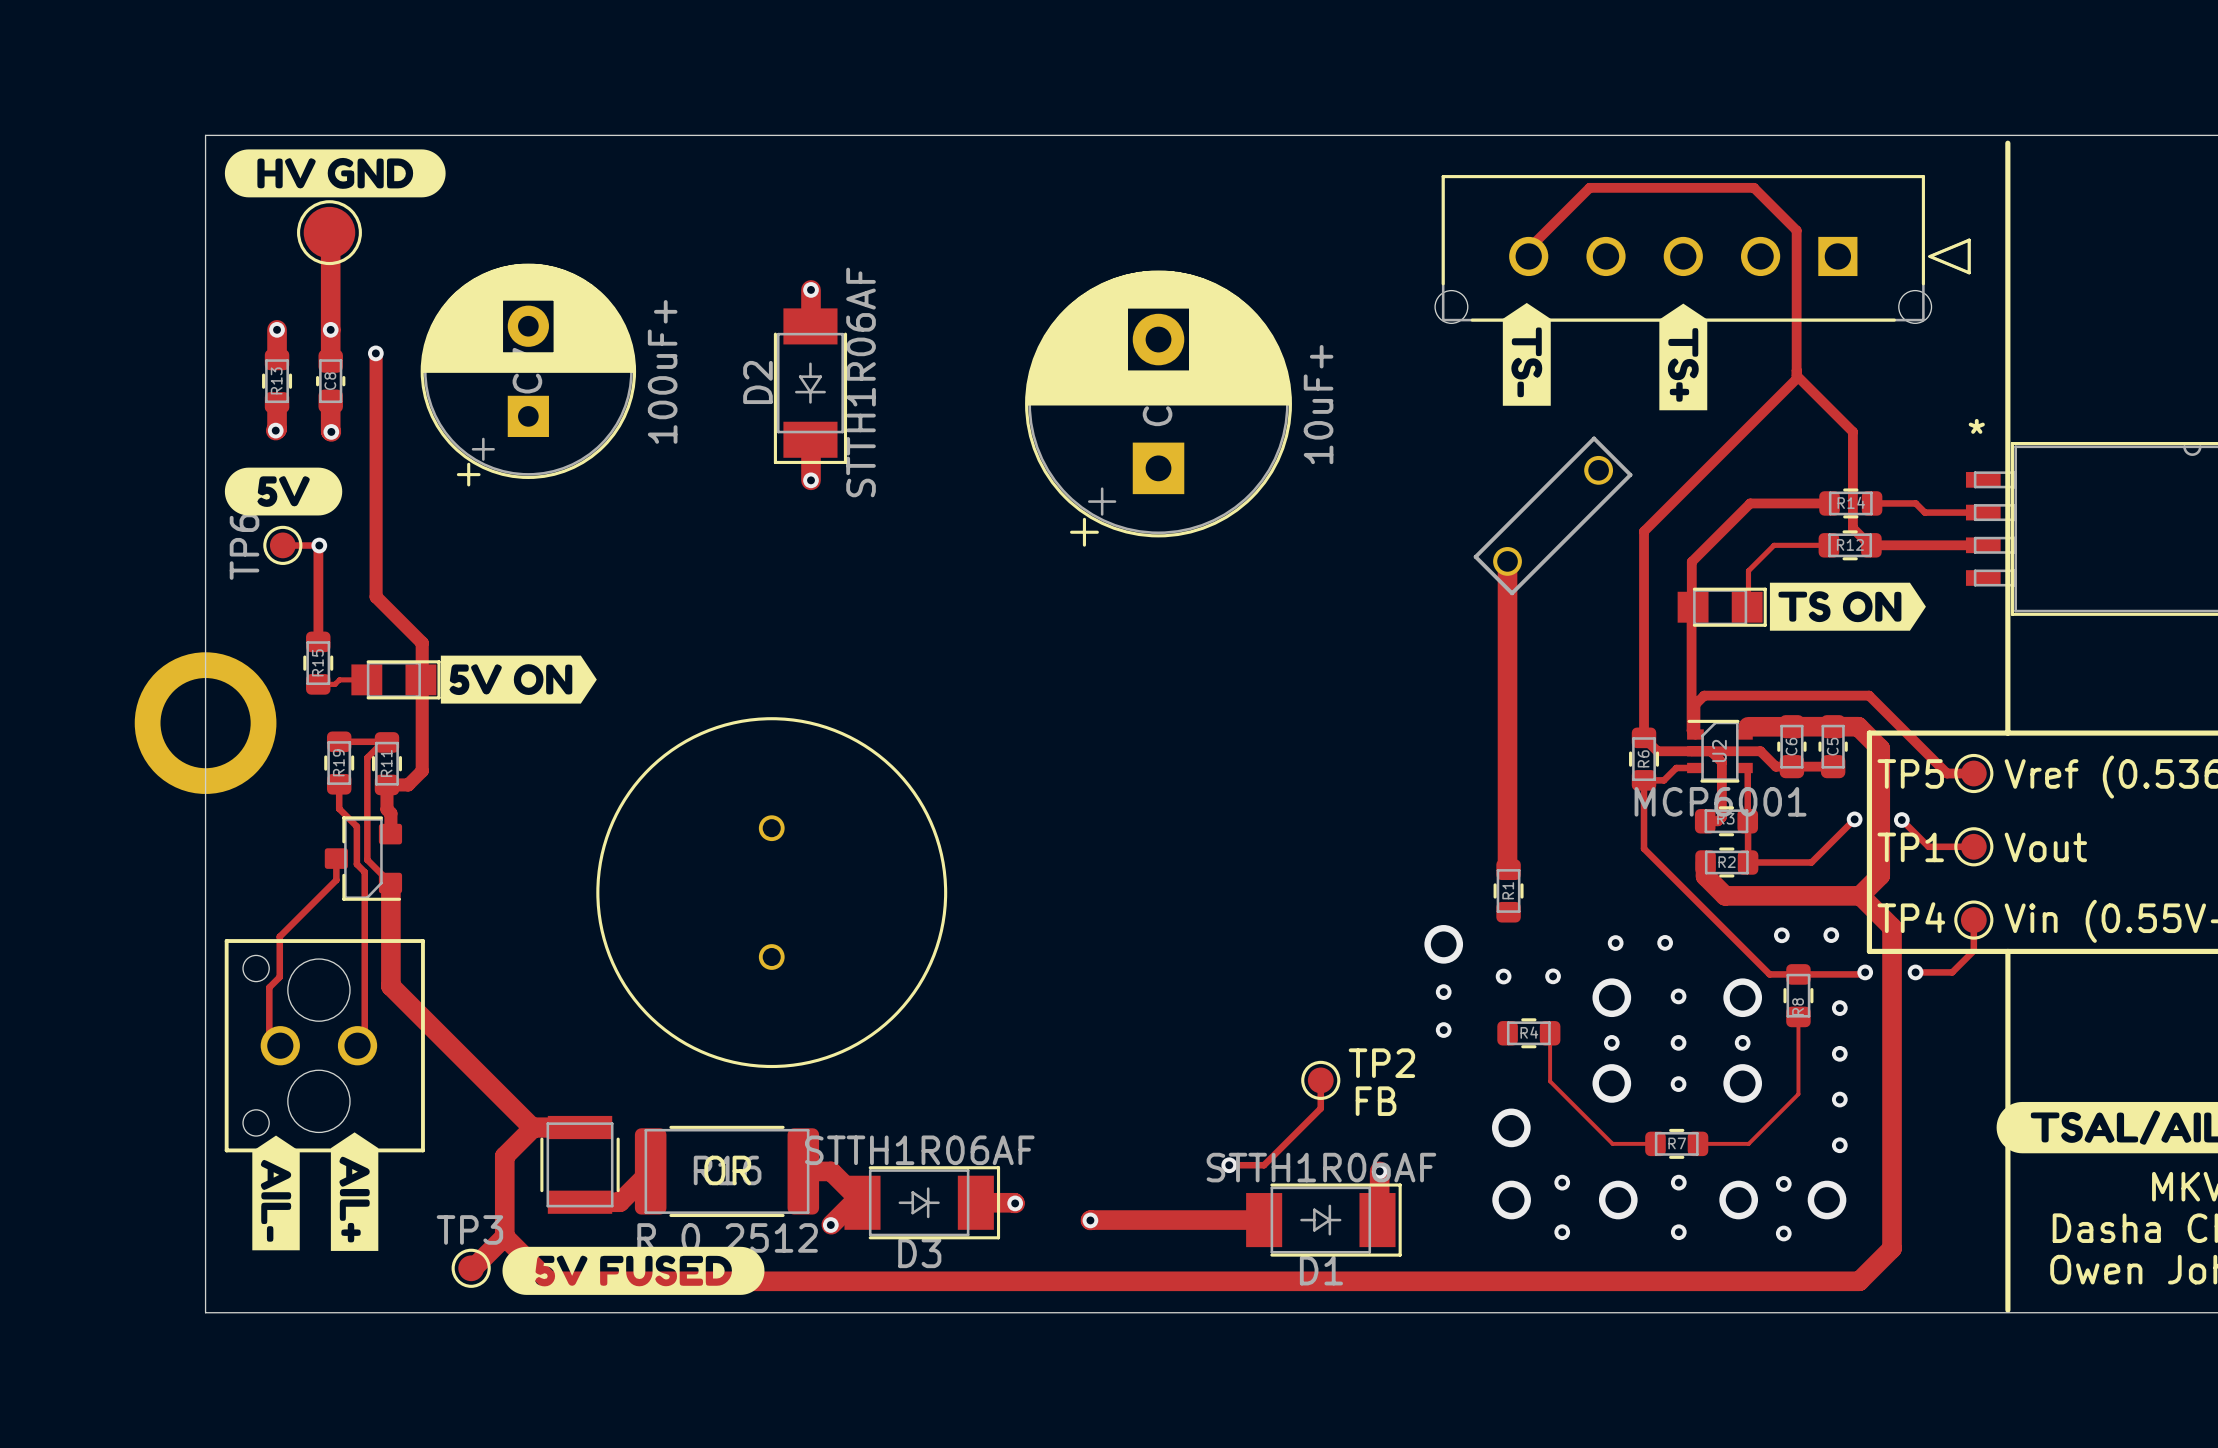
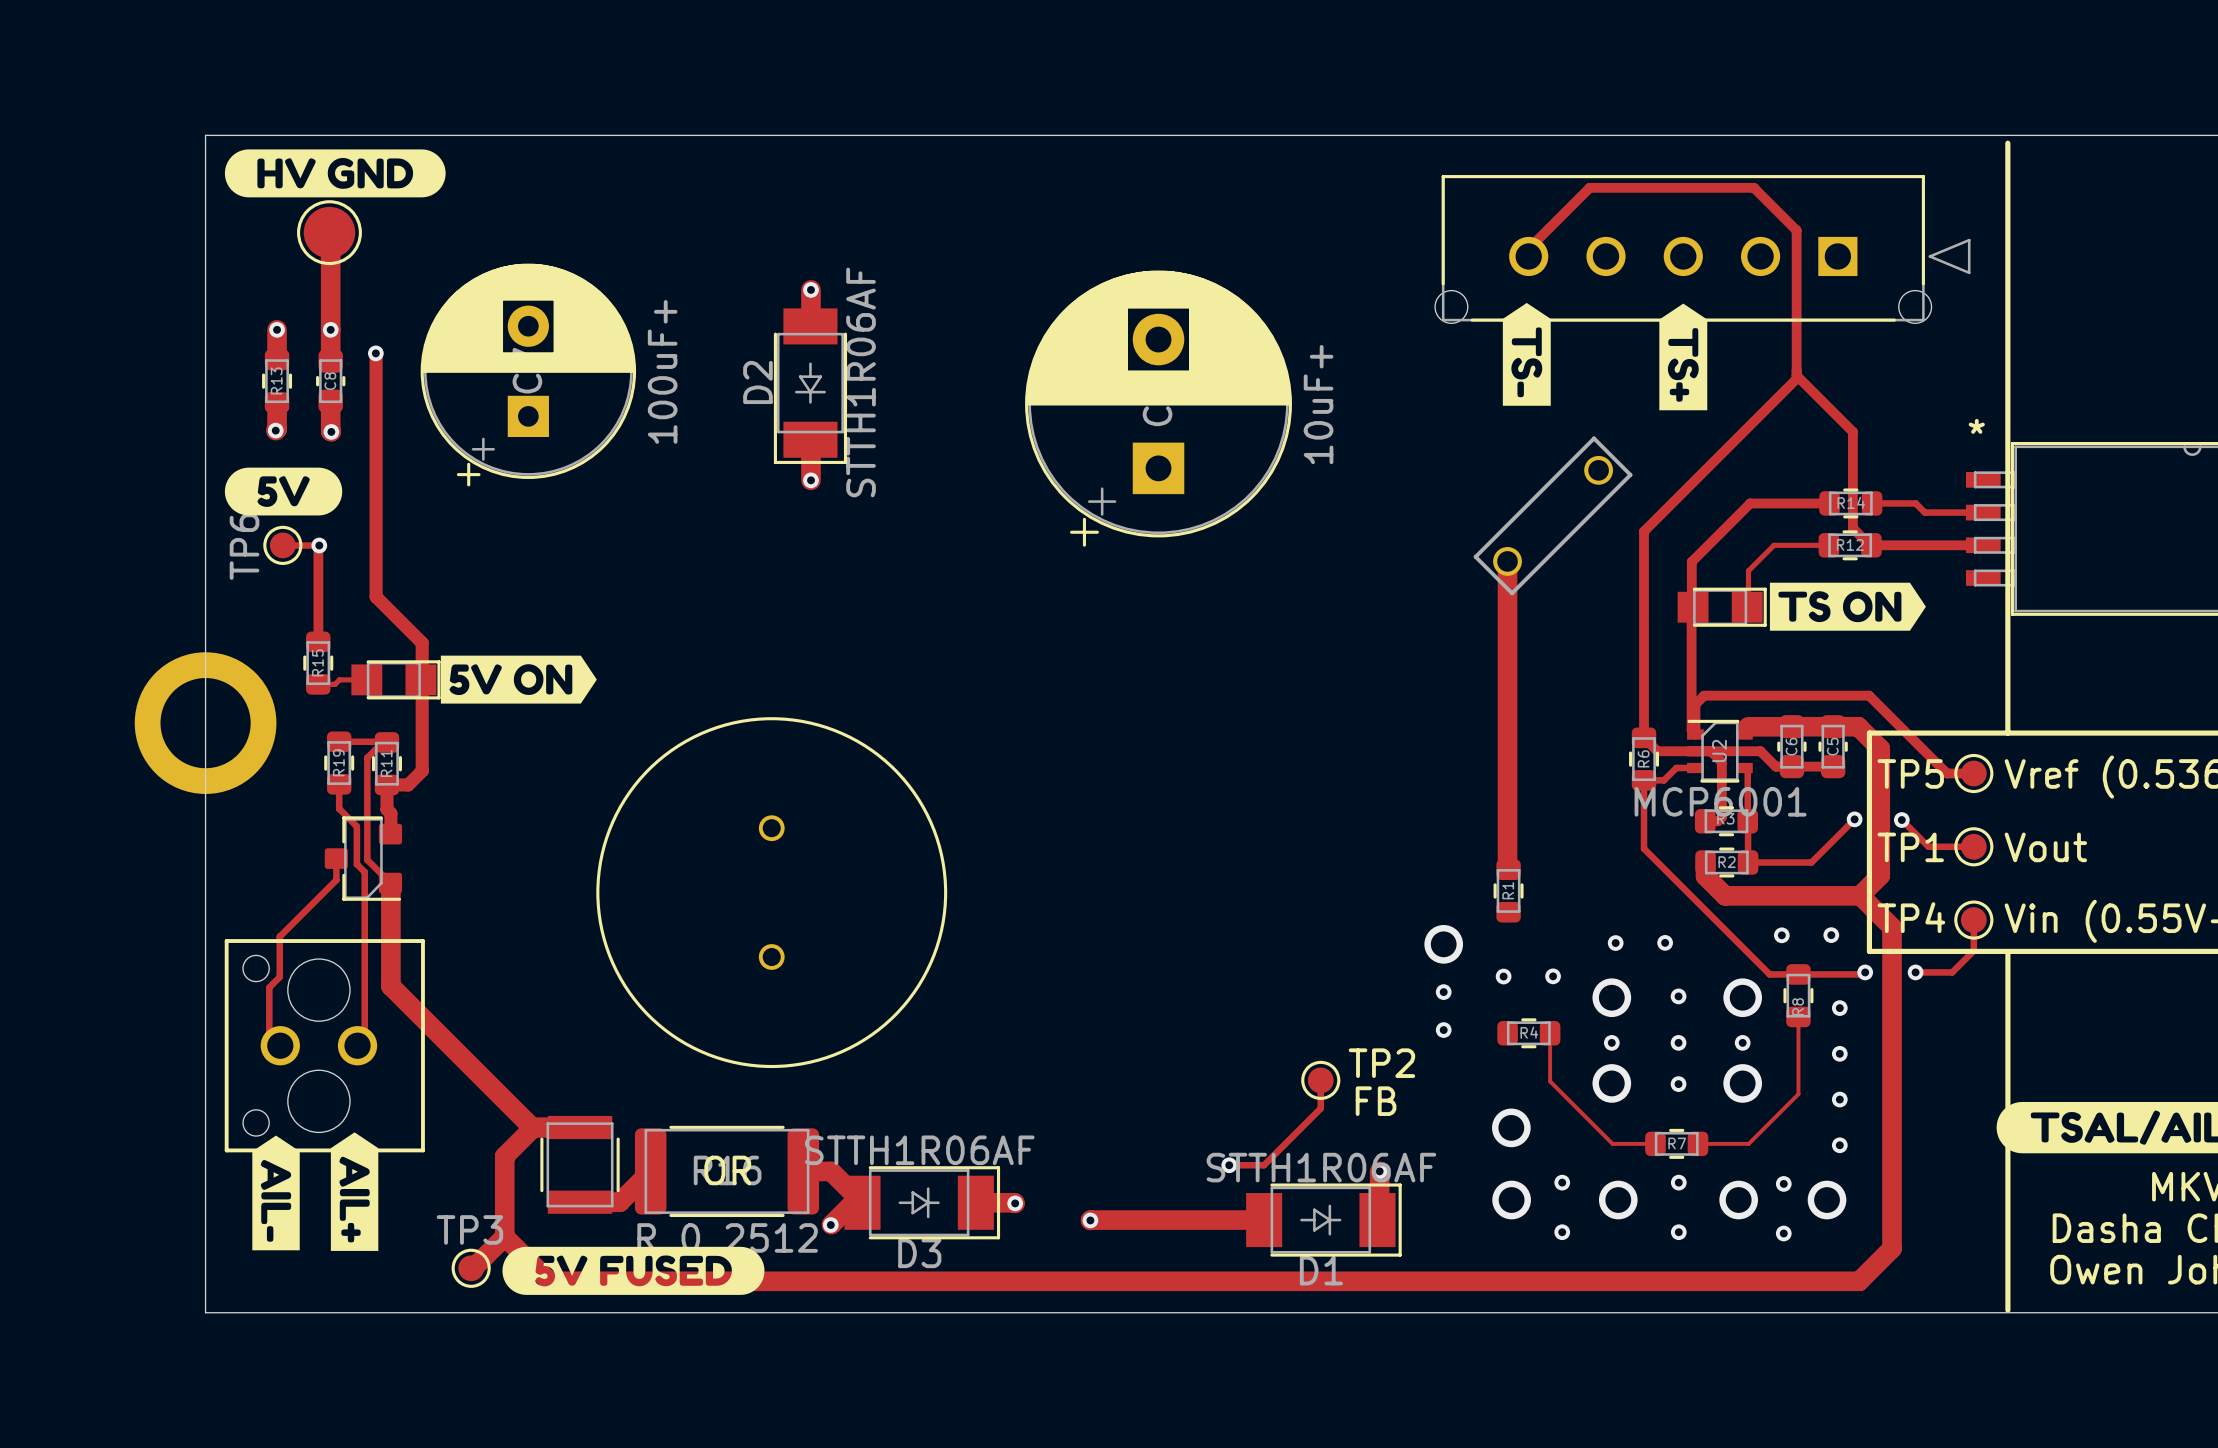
part footprint: [1435, 175, 1971, 324] -> [1435, 175, 1971, 324]

